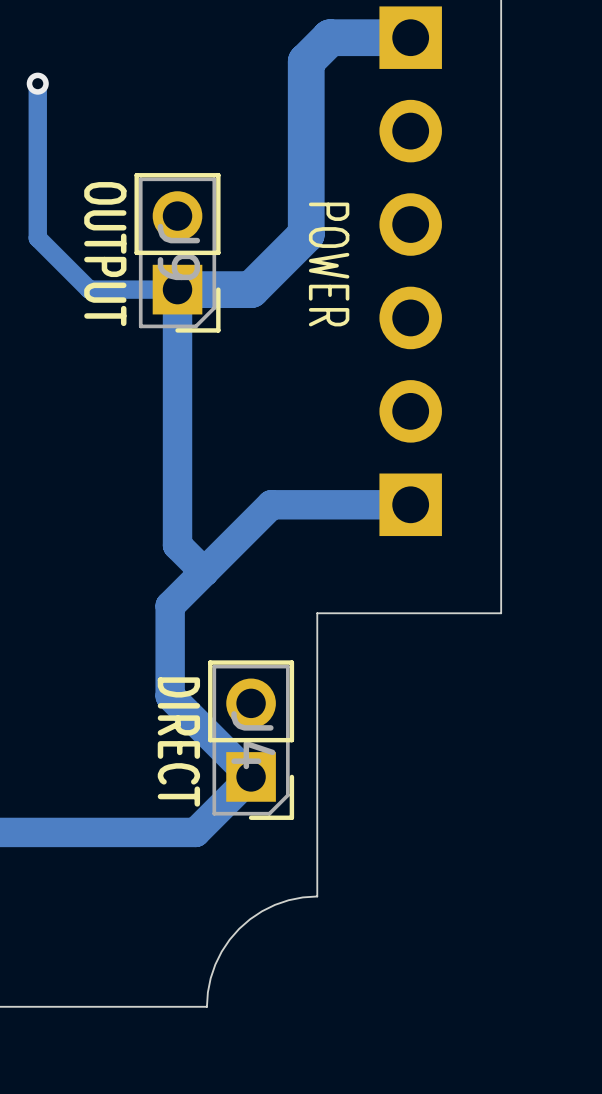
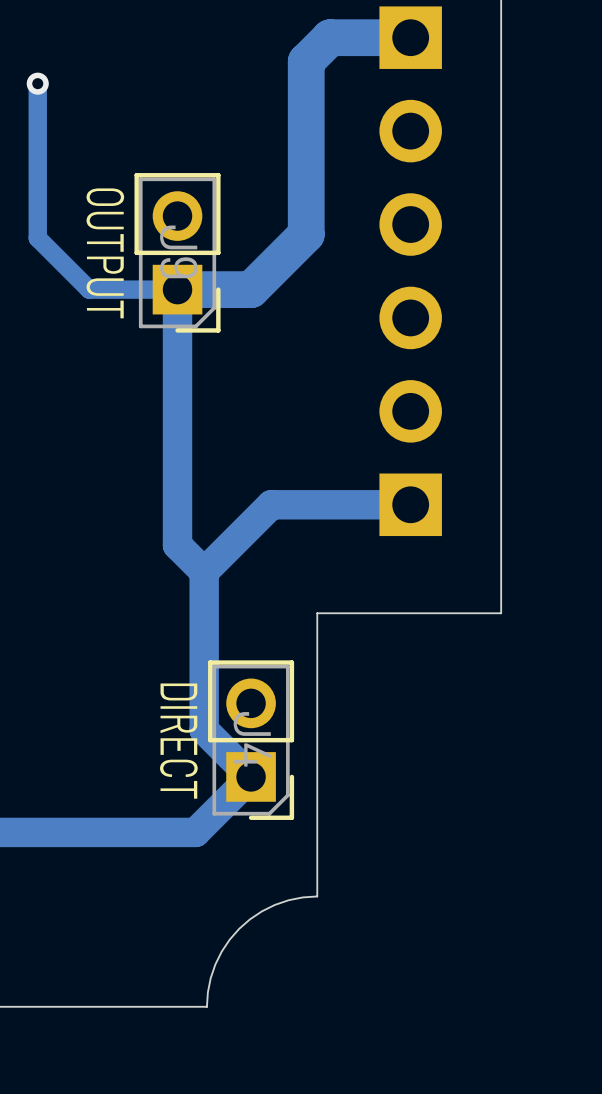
text: POWER (329, 264) -> none
track: (204, 571) (170, 605) (170, 696) (204, 730) -> (204, 571) (204, 730)

